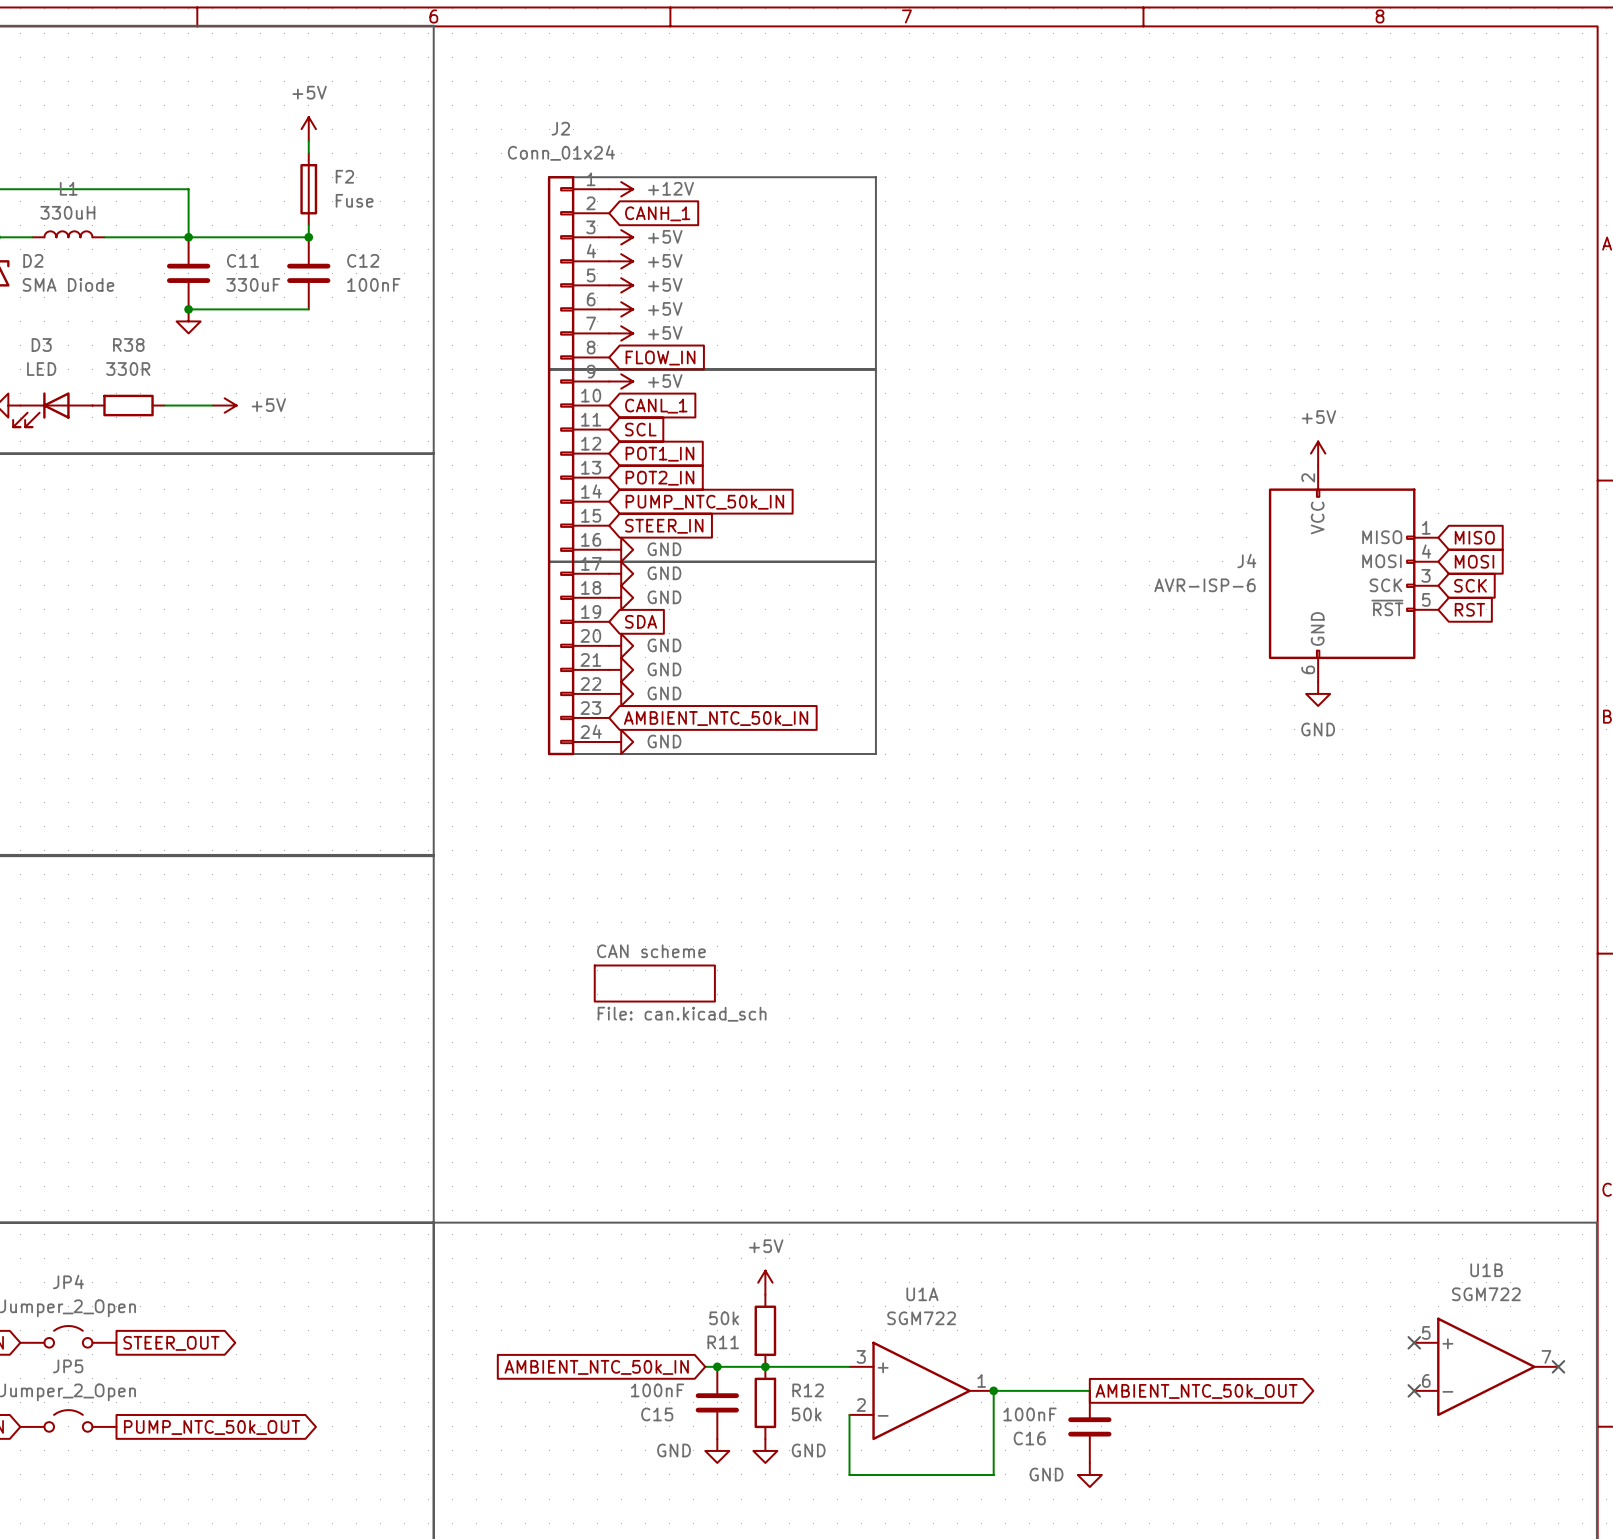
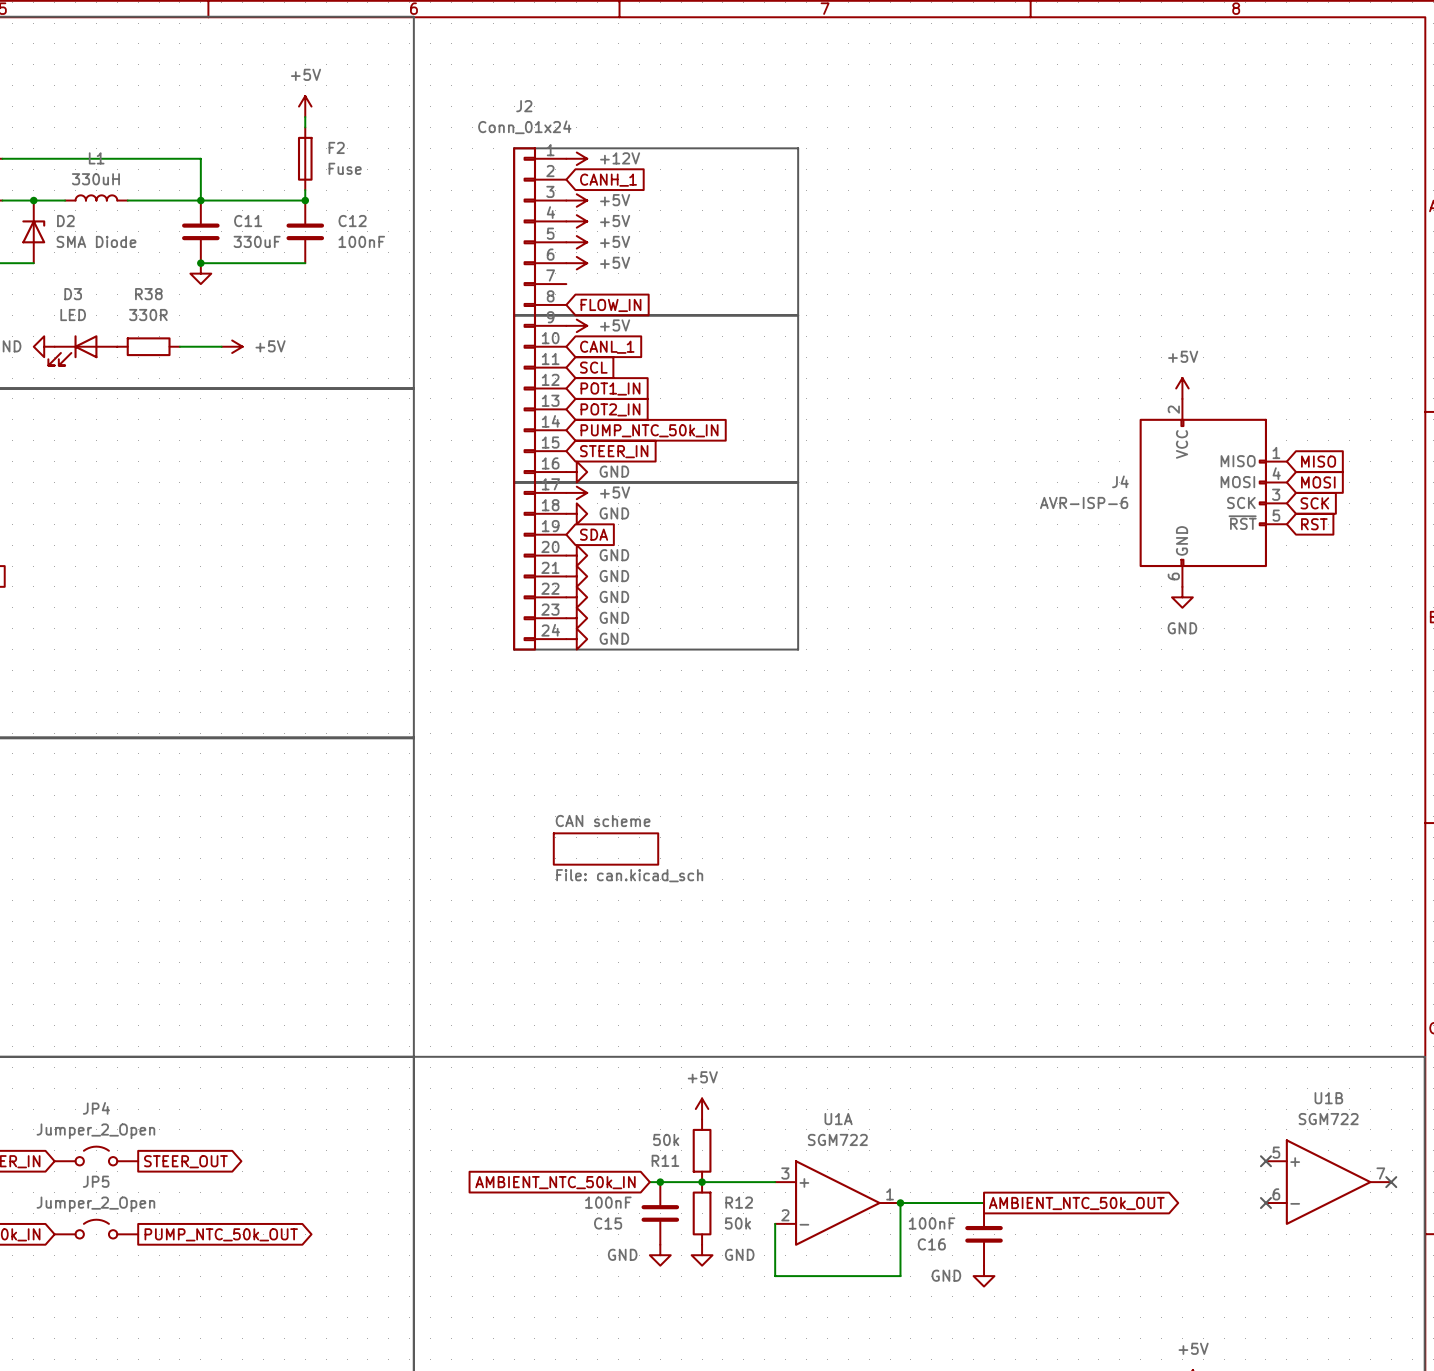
power symbol: +5V (621, 333) -> none
power symbol: GND (621, 573) -> +5V (576, 492)
power symbol: none -> GND (576, 618)
global label: AMBIENT_NTC_50k_IN (716, 718) -> none

